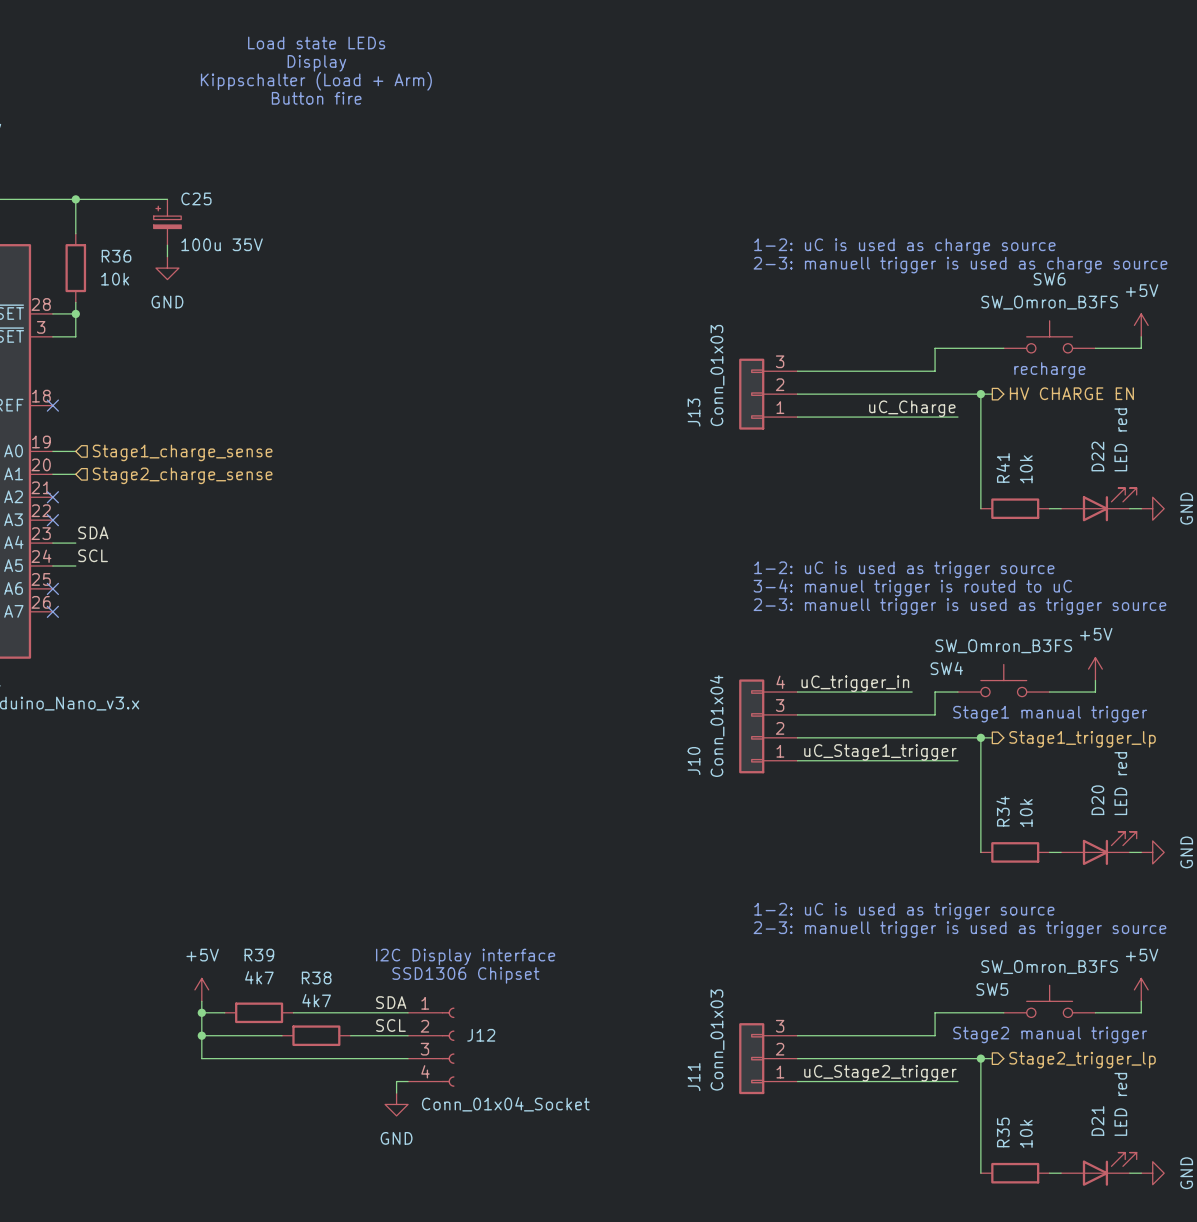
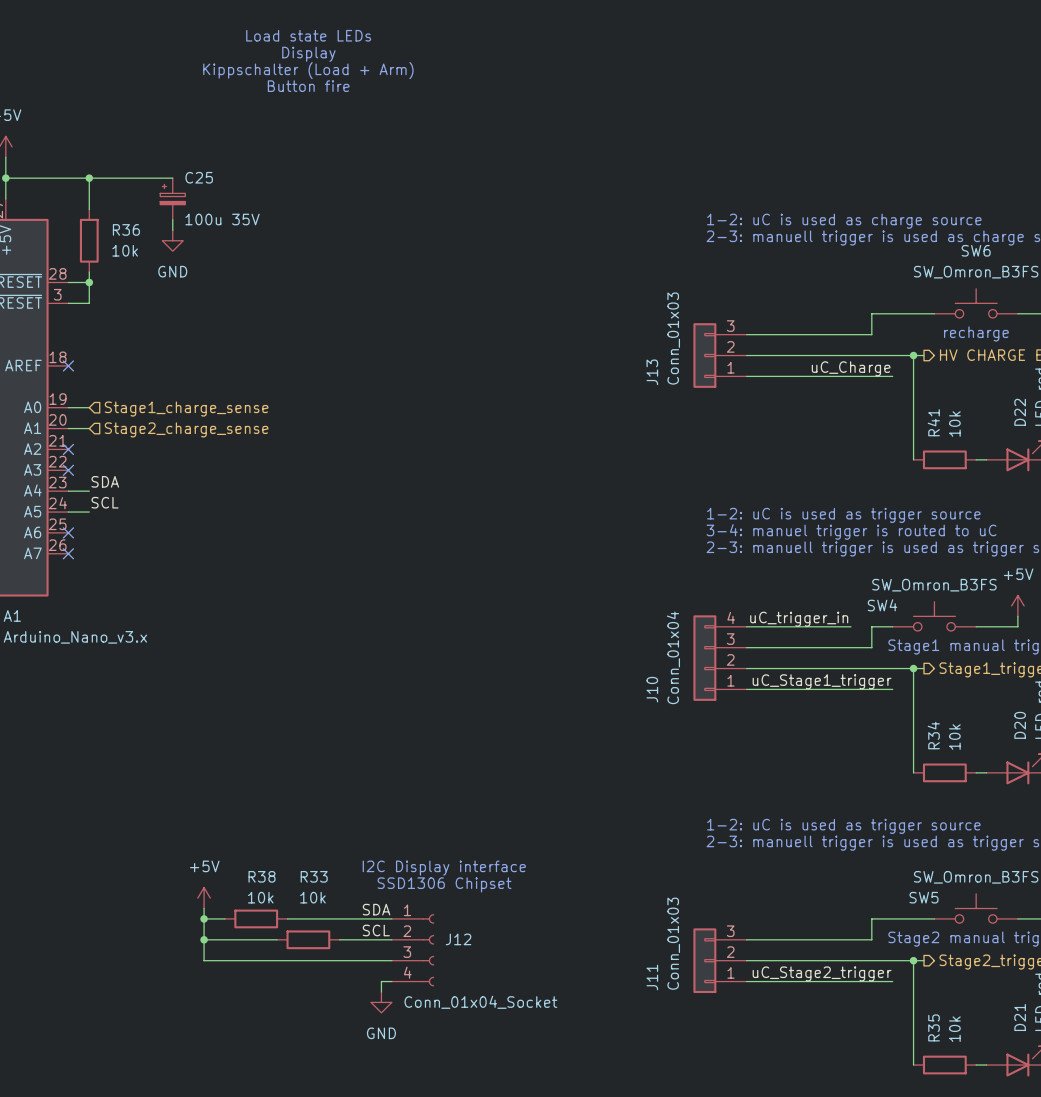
R39 name: R39 (259, 955) -> R38 (262, 876)
R39 value: 4k7 (259, 977) -> 10k (260, 897)
R38 name: R38 (316, 978) -> R33 (314, 876)
R38 value: 4k7 (316, 1000) -> 10k (312, 897)

